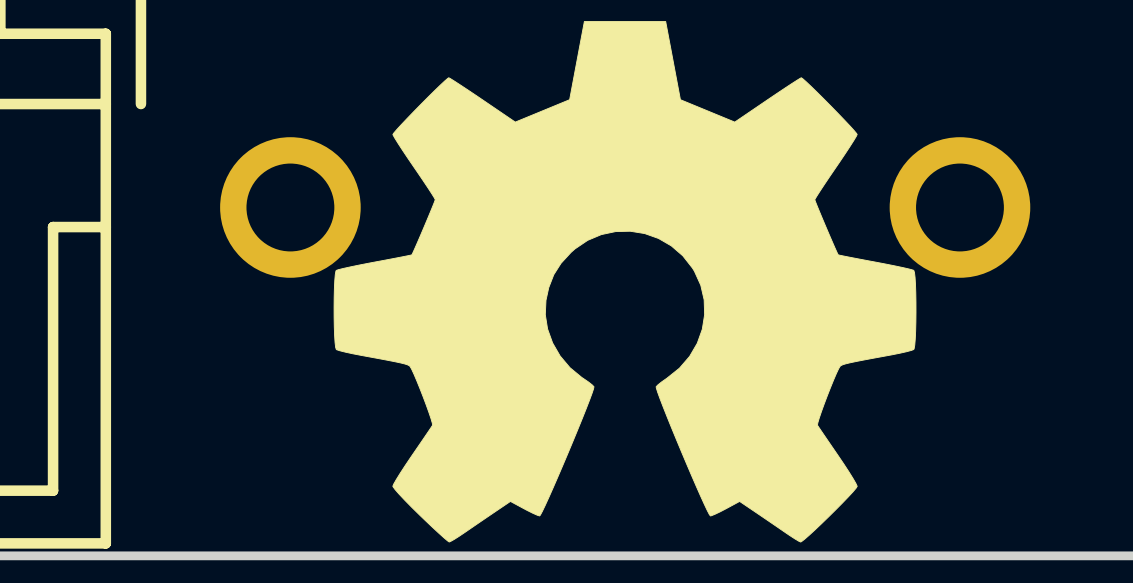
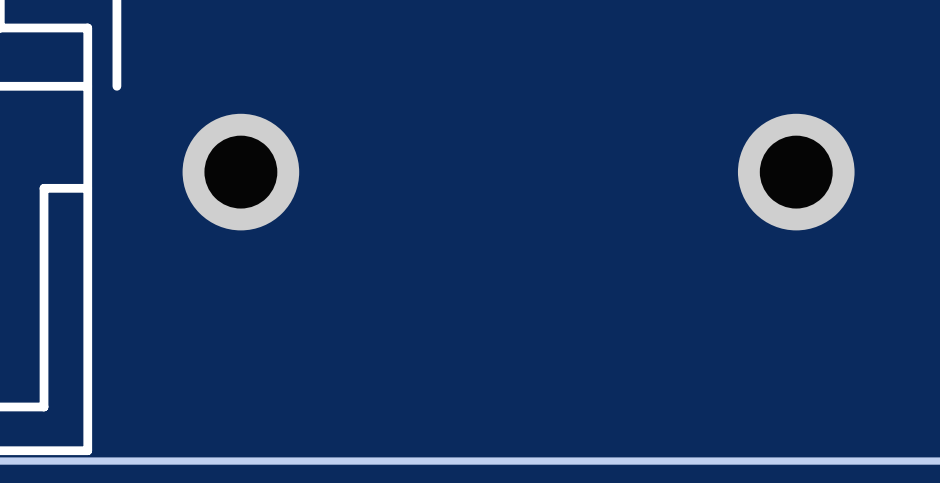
drawing: [333, 21, 917, 543] -> none

